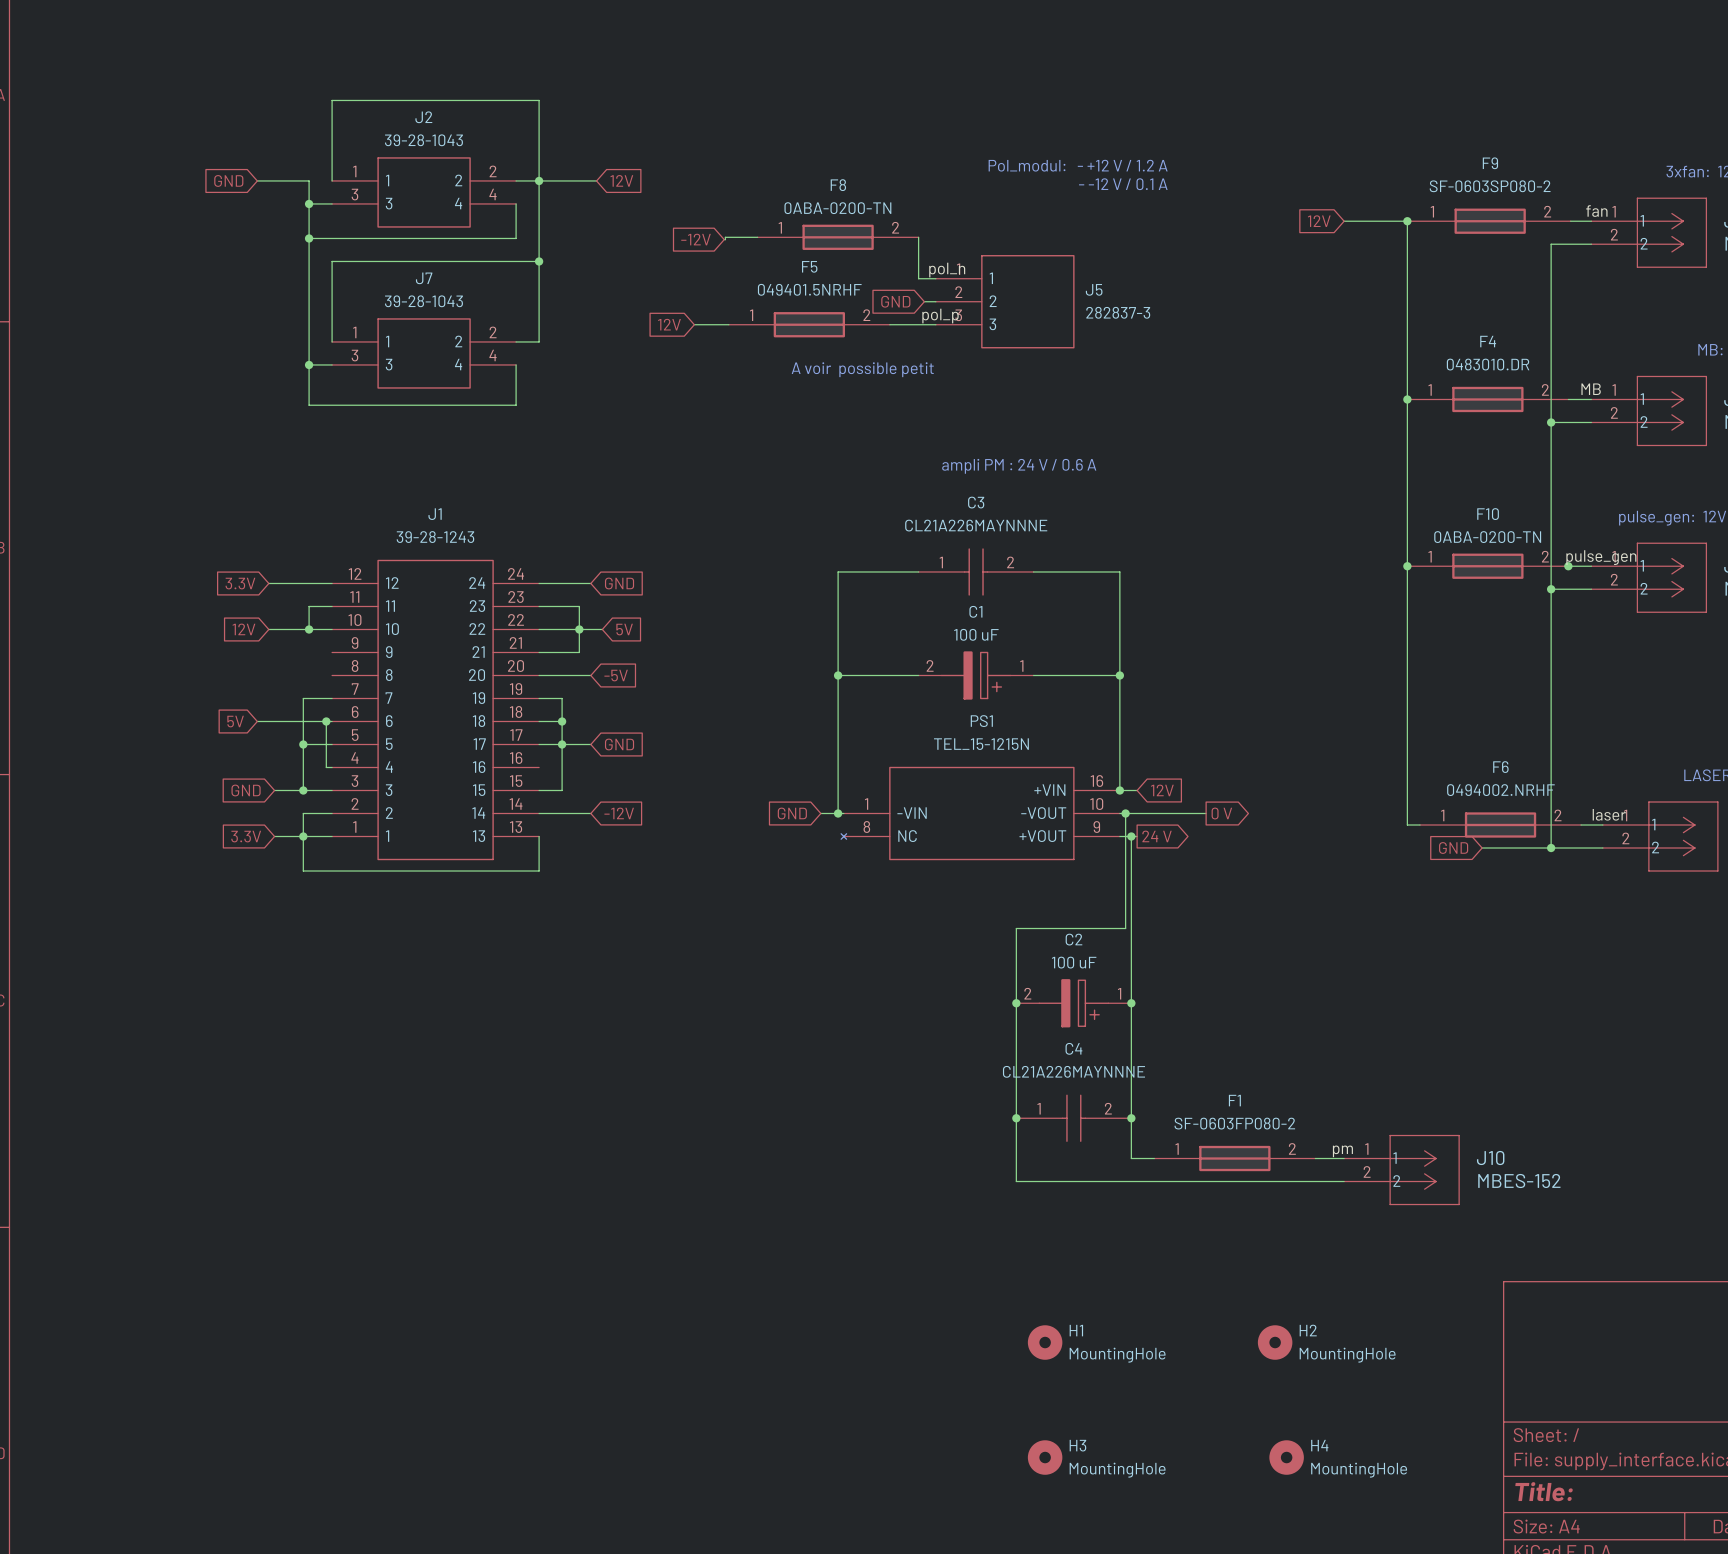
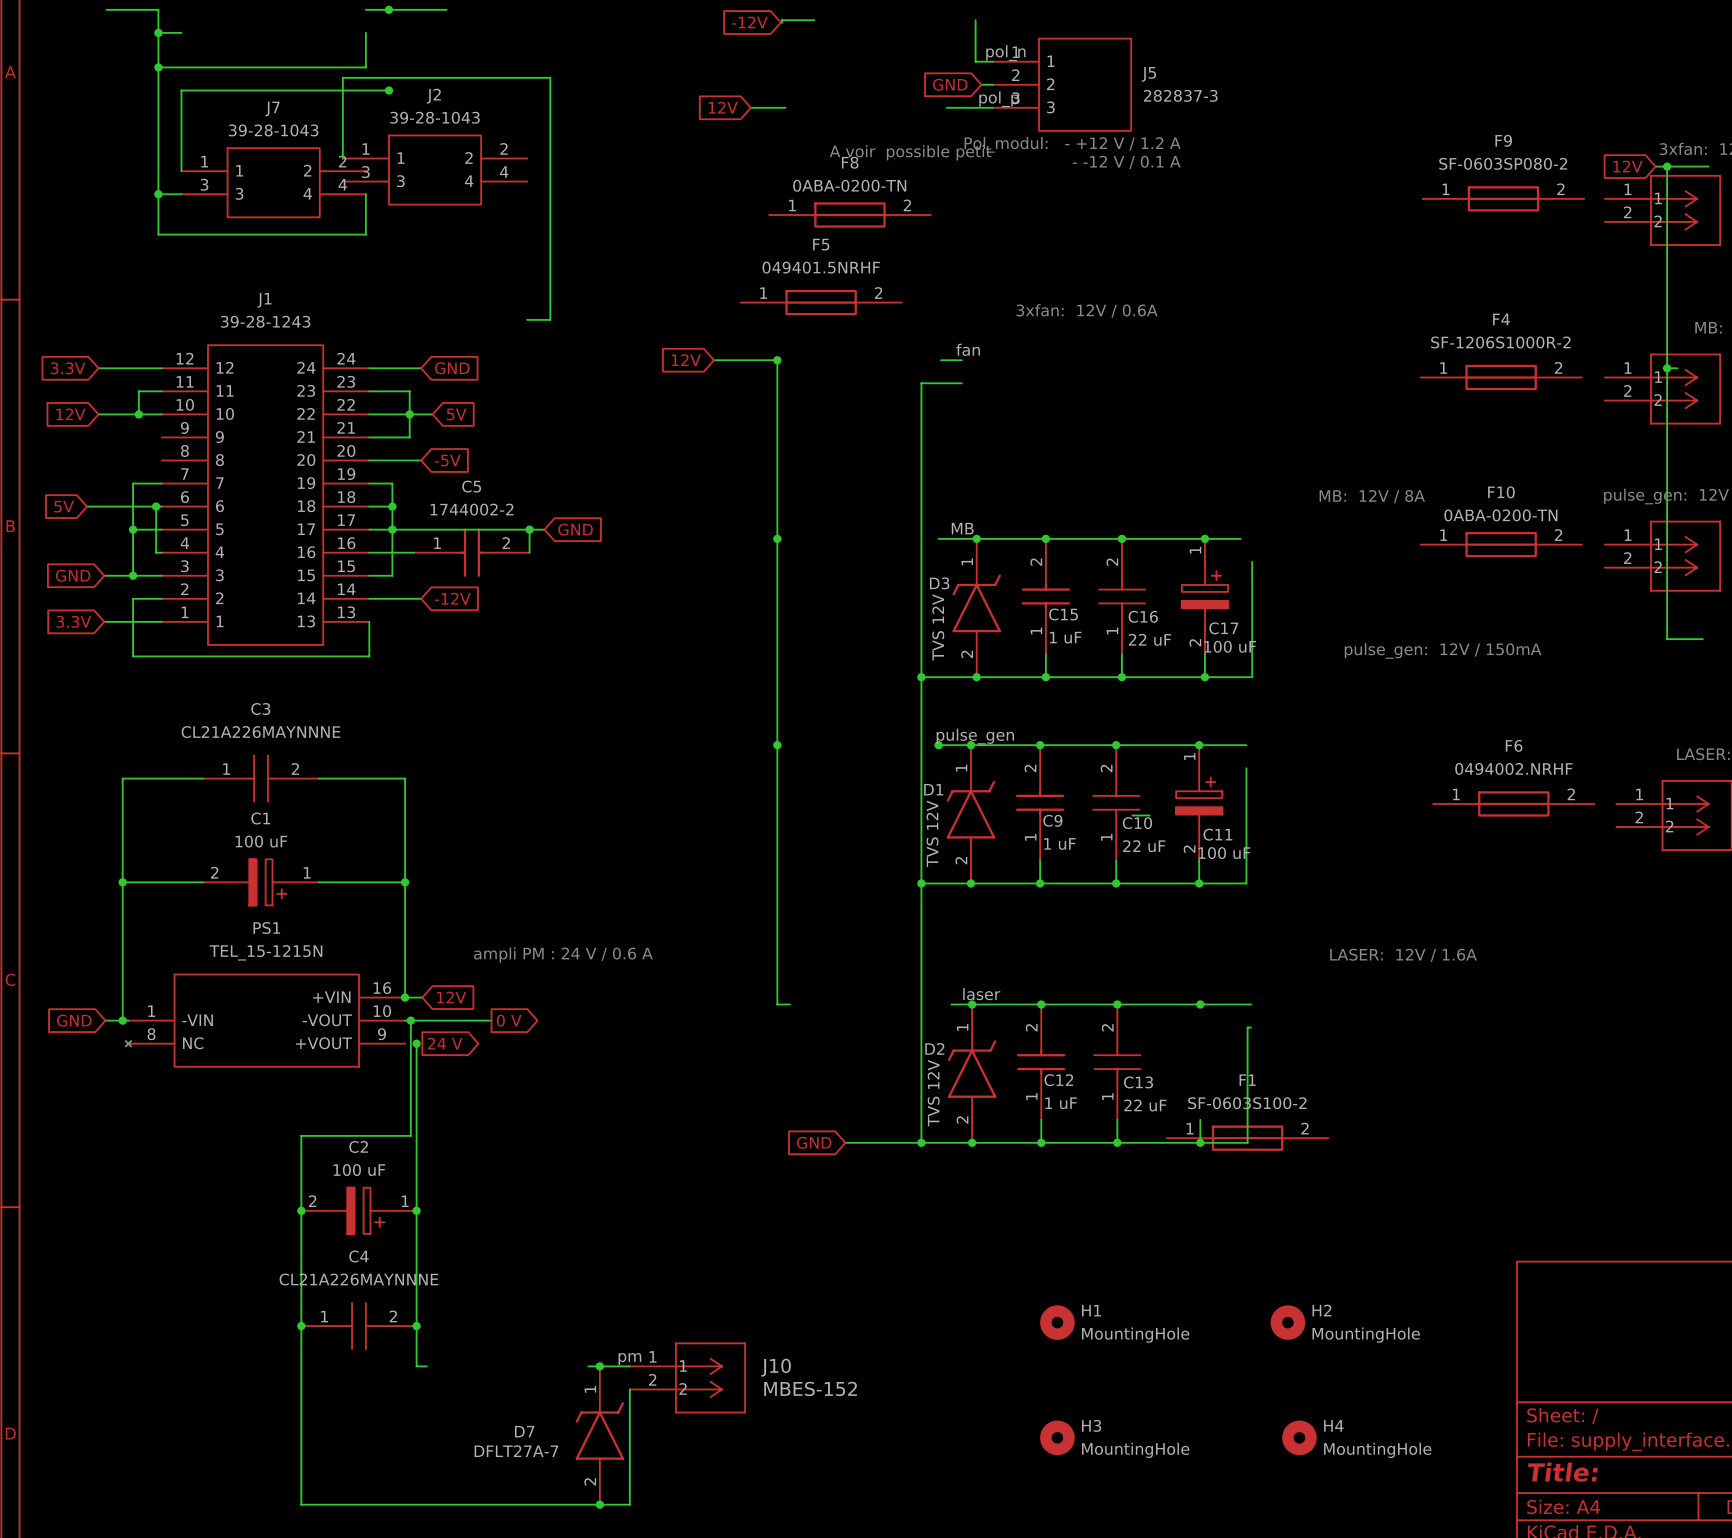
wire: none -> (106, 9) (158, 9) (158, 234) (365, 234) (365, 194)
junction: none -> (388, 9)
junction: none -> (158, 32)
junction: none -> (158, 67)
junction: none -> (388, 90)
global label: none -> 12V (723, 107)
global label: GND (228, 180) -> none
wire: (257, 180) (309, 180) (309, 364) -> none
wire: (516, 180) (596, 180) -> (365, 9) (446, 9)
junction: (539, 180) -> none
global label: 12V (621, 180) -> none
global label: none -> 12V (1627, 166)
wire: none -> (1655, 166) (1708, 166)
wire: none -> (1667, 166) (1667, 639) (1702, 639)
junction: none -> (1667, 166)
wire: (309, 203) (332, 203) -> (158, 32) (181, 32)
junction: (309, 203) -> none
wire: (516, 203) (516, 238) (309, 238) -> (365, 32) (365, 67) (158, 67)
label: fan (1596, 211) -> none
junction: none -> (158, 194)
global label: 12V (1319, 221) -> none
wire: (1344, 221) (1409, 221) -> none
wire: (1407, 221) (1407, 825) (1420, 825) -> none
junction: (1407, 221) -> none
wire: (1570, 221) (1591, 221) -> none
wire: (757, 237) (725, 237) (724, 239) -> (814, 20) (781, 20) (780, 22)
wire: (918, 237) (918, 278) (935, 278) -> (975, 20) (975, 61) (992, 61)
junction: (309, 238) -> none
global label position: -12V (696, 239) -> -12V (749, 22)
wire: (1591, 244) (1551, 244) (1551, 848) -> none
wire: (539, 261) (332, 261) (332, 341) -> (388, 90) (181, 90) (181, 171)
junction: (539, 261) -> none
label position: pol_n (947, 270) -> pol_n (1005, 53)
global label position: GND (895, 301) -> GND (950, 84)
wire: (924, 301) (935, 301) -> (981, 84) (992, 84)
J5 position: (1005, 301) -> (1062, 84)
label position: pol_p (940, 316) -> pol_p (999, 99)
global label position: 12V (669, 324) -> 12V (686, 360)
wire: (694, 324) (728, 324) -> (750, 107) (785, 107)
wire: (889, 324) (935, 324) -> (946, 107) (992, 107)
text: none -> 3xfan: 12V / 0.6A (1087, 310)
J7 position: (424, 353) -> (273, 182)
wire: (309, 364) (332, 364) -> (158, 194) (181, 194)
wire: (309, 364) (309, 405) (516, 405) (516, 364) -> none
junction: (309, 364) -> none
F4 value: 0483010.DR (1488, 364) -> SF-1206S1000R-2 (1500, 342)
text position: A voir possible petit (862, 369) -> A voir possible petit (910, 152)
label: none -> fan (968, 349)
wire: none -> (713, 360) (779, 360)
wire: none -> (777, 360) (777, 1004) (790, 1004)
junction: none -> (777, 360)
wire: none -> (941, 360) (961, 360)
label: MB (1591, 389) -> none
global label: none -> 3.3V (68, 368)
wire: none -> (98, 368) (161, 368)
wire: none -> (369, 368) (421, 368)
global label: none -> GND (452, 368)
wire: none -> (1667, 368) (1677, 368)
junction: none -> (1667, 368)
junction: (1407, 399) -> none
wire: (1568, 399) (1591, 399) -> none
wire: none -> (961, 383) (921, 383) (921, 1142)
wire: none -> (161, 391) (138, 391) (138, 414)
wire: none -> (369, 391) (409, 391) (409, 437) (369, 437)
wire: (1551, 422) (1591, 422) -> none
junction: (1551, 422) -> none
global label: none -> 12V (70, 414)
wire: none -> (98, 414) (161, 414)
junction: none -> (138, 414)
junction: none -> (409, 414)
global label: none -> 5V (456, 414)
text: ampli PM : 24 V / 0.6 A (1019, 466) -> none
wire: none -> (369, 460) (421, 460)
global label: none -> -5V (447, 460)
wire: none -> (161, 483) (133, 483) (133, 575)
wire: none -> (369, 483) (392, 483) (392, 575) (369, 575)
text: none -> MB: 12V / 8A (1372, 496)
global label: none -> 5V (64, 506)
wire: none -> (86, 506) (161, 506)
wire: none -> (156, 506) (156, 552) (161, 552)
junction: none -> (156, 506)
wire: none -> (369, 506) (392, 506)
junction: none -> (392, 506)
label: none -> MB (962, 528)
wire: none -> (133, 529) (161, 529)
junction: none -> (133, 529)
wire: none -> (369, 529) (544, 529)
junction: none -> (392, 529)
wire: none -> (529, 529) (529, 552)
junction: none -> (529, 529)
label: pulse_gen (1601, 557) -> none
junction: none -> (777, 538)
wire: none -> (938, 538) (1240, 538)
junction: none -> (976, 538)
junction: none -> (1045, 538)
junction: none -> (1121, 538)
junction: none -> (1204, 538)
junction: (1407, 566) -> none
wire: (1564, 566) (1591, 566) -> none
junction: (1568, 566) -> none
wire: (918, 571) (838, 571) (838, 813) -> none
C3 position: (976, 571) -> (261, 778)
wire: (1033, 571) (1119, 571) (1119, 790) (1137, 790) -> none
wire: none -> (369, 552) (414, 552)
C5: none -> 1744002-2 (471, 552)
global label: 3.3V (240, 583) -> none
wire: (268, 583) (332, 583) -> (369, 414) (432, 414)
wire: (539, 583) (590, 583) -> (369, 598) (421, 598)
global label position: GND (619, 583) -> GND (575, 529)
wire: none -> (1252, 561) (1252, 677) (921, 677)
wire: (1551, 589) (1591, 589) -> none
junction: (1551, 589) -> none
global label: none -> GND (73, 575)
wire: none -> (104, 575) (161, 575)
junction: none -> (133, 575)
wire: (332, 606) (309, 606) (309, 629) -> none
wire: (539, 606) (579, 606) (579, 652) (539, 652) -> none
C15: none -> 1 uF (1045, 596)
C16: none -> 22 uF (1121, 596)
C17: none -> 100 uF (1204, 596)
wire: none -> (161, 598) (133, 598) (133, 656) (369, 656) (369, 621)
global label: none -> -12V (452, 598)
global label: 12V (243, 629) -> none
wire: (268, 629) (332, 629) -> none
junction: (309, 629) -> none
wire: (539, 629) (602, 629) -> none
junction: (579, 629) -> none
global label: 5V (624, 629) -> none
D3: none -> TVS 12V (976, 608)
global label: none -> 3.3V (73, 621)
wire: none -> (104, 621) (161, 621)
text: none -> pulse_gen: 12V / 150mA (1443, 650)
wire: (539, 675) (590, 675) -> none
global label: -5V (616, 675) -> none
wire: (838, 675) (918, 675) -> none
junction: (838, 675) -> none
C1 position: (976, 675) -> (261, 882)
wire: (1033, 675) (1119, 675) -> (1045, 654) (1045, 677)
wire: none -> (1121, 654) (1121, 677)
junction position: (1119, 675) -> (1121, 677)
wire: none -> (1204, 654) (1204, 677)
wire: (332, 698) (303, 698) (303, 790) -> none
wire: (539, 698) (562, 698) (562, 790) (539, 790) -> none
junction: none -> (921, 677)
junction: none -> (976, 677)
junction: none -> (1045, 677)
junction: none -> (1204, 677)
J1 position: (435, 709) -> (265, 495)
global label: 5V (235, 721) -> none
wire: (257, 721) (332, 721) -> none
wire: (326, 721) (326, 767) (332, 767) -> none
junction: (326, 721) -> none
wire: (539, 721) (562, 721) -> none
junction: (562, 721) -> none
wire: (303, 744) (332, 744) -> none
junction: (303, 744) -> none
wire: (539, 744) (590, 744) -> none
junction: (562, 744) -> none
global label: GND (619, 744) -> none
label: none -> pulse_gen (975, 736)
junction: none -> (777, 745)
wire: none -> (935, 745) (1246, 745)
junction: none -> (938, 745)
junction: none -> (970, 745)
junction: none -> (1040, 745)
junction: none -> (1116, 745)
junction: none -> (1199, 745)
wire: none -> (1246, 768) (1246, 883) (921, 883)
global label: GND (246, 790) -> none
wire: (274, 790) (332, 790) -> none
junction: (303, 790) -> none
junction: (1119, 790) -> none
global label: 12V (1162, 790) -> none
wire: none -> (203, 778) (122, 778) (122, 1020)
wire: none -> (318, 778) (405, 778) (405, 997) (422, 997)
wire: (332, 813) (303, 813) (303, 871) (539, 871) (539, 836) -> none
wire: (539, 813) (590, 813) -> none
global label: -12V (619, 813) -> none
global label: GND (792, 813) -> none
wire: (820, 813) (843, 813) -> none
junction: (838, 813) -> none
PS1 position: (980, 813) -> (265, 1020)
wire: (1119, 813) (1206, 813) -> none
wire: (1125, 813) (1125, 928) (1016, 928) (1016, 1181) (1344, 1181) -> none
junction: (1125, 813) -> none
global label: 0 V (1221, 813) -> none
label: laser (1609, 814) -> none
C9: none -> 1 uF (1040, 802)
C10: none -> 22 uF (1116, 802)
C11: none -> 100 uF (1199, 802)
wire: (1581, 825) (1602, 825) -> none
D1: none -> TVS 12V (970, 814)
global label: 3.3V (246, 836) -> none
wire: (274, 836) (332, 836) -> none
junction: (303, 836) -> none
wire: (1131, 836) (1131, 1158) (1154, 1158) -> none
junction: (1131, 836) -> none
global label: 24 V (1157, 836) -> none
global label: GND (1453, 848) -> none
wire: (1482, 848) (1602, 848) -> none
junction: (1551, 848) -> none
wire: none -> (1040, 860) (1040, 883)
wire: none -> (1116, 860) (1116, 883)
wire: none -> (1199, 860) (1199, 883)
wire: none -> (122, 882) (203, 882)
junction: none -> (122, 882)
wire: none -> (318, 882) (405, 882)
junction: none -> (405, 882)
junction: none -> (921, 883)
junction: none -> (970, 883)
junction: none -> (1040, 883)
junction: none -> (1116, 883)
junction: none -> (1199, 883)
text: none -> ampli PM : 24 V / 0.6 A (563, 954)
text: none -> LASER: 12V / 1.6A (1403, 955)
junction position: (1016, 1003) -> (1041, 1004)
C2 position: (1073, 1003) -> (358, 1210)
junction: (1131, 1003) -> none
label: none -> laser (981, 994)
junction: none -> (405, 997)
global label: none -> 12V (451, 997)
wire: none -> (951, 1004) (1251, 1004)
junction: none -> (972, 1004)
junction: none -> (1117, 1004)
junction: none -> (1200, 1004)
global label: none -> GND (74, 1020)
wire: none -> (105, 1020) (128, 1020)
junction: none -> (122, 1020)
wire: none -> (405, 1020) (491, 1020)
wire: none -> (410, 1020) (410, 1135) (301, 1135) (301, 1504) (629, 1504) (629, 1389)
junction: none -> (410, 1020)
global label: none -> 0 V (509, 1020)
wire: none -> (1251, 1027) (1247, 1027) (1247, 1142) (845, 1142)
wire: none -> (416, 1043) (416, 1366) (426, 1366)
junction: none -> (416, 1043)
global label: none -> 24 V (445, 1043)
C12: none -> 1 uF (1041, 1062)
C13: none -> 22 uF (1117, 1062)
D2: none -> TVS 12V (972, 1073)
junction: (1016, 1118) -> none
C4 position: (1073, 1118) -> (358, 1326)
junction: (1131, 1118) -> none
F1 value: SF-0603FP080-2 (1234, 1123) -> SF-0603S100-2 (1247, 1103)
wire: none -> (1041, 1119) (1041, 1142)
wire: none -> (1117, 1119) (1117, 1142)
wire: none -> (1200, 1119) (1200, 1142)
label: pm (1342, 1151) -> none
wire: (1315, 1158) (1344, 1158) -> none
global label: none -> GND (814, 1142)
junction: none -> (921, 1142)
junction: none -> (972, 1142)
junction: none -> (1041, 1142)
junction: none -> (1117, 1142)
junction: none -> (1200, 1142)
J10 position: (1401, 1170) -> (687, 1377)
junction: none -> (301, 1210)
junction: none -> (416, 1210)
junction: none -> (301, 1326)
junction: none -> (416, 1326)
label: none -> pm (629, 1359)
wire: none -> (588, 1366) (629, 1366)
junction: none -> (599, 1366)
D7: none -> DFLT27A-7 (599, 1435)
junction: none -> (599, 1504)

